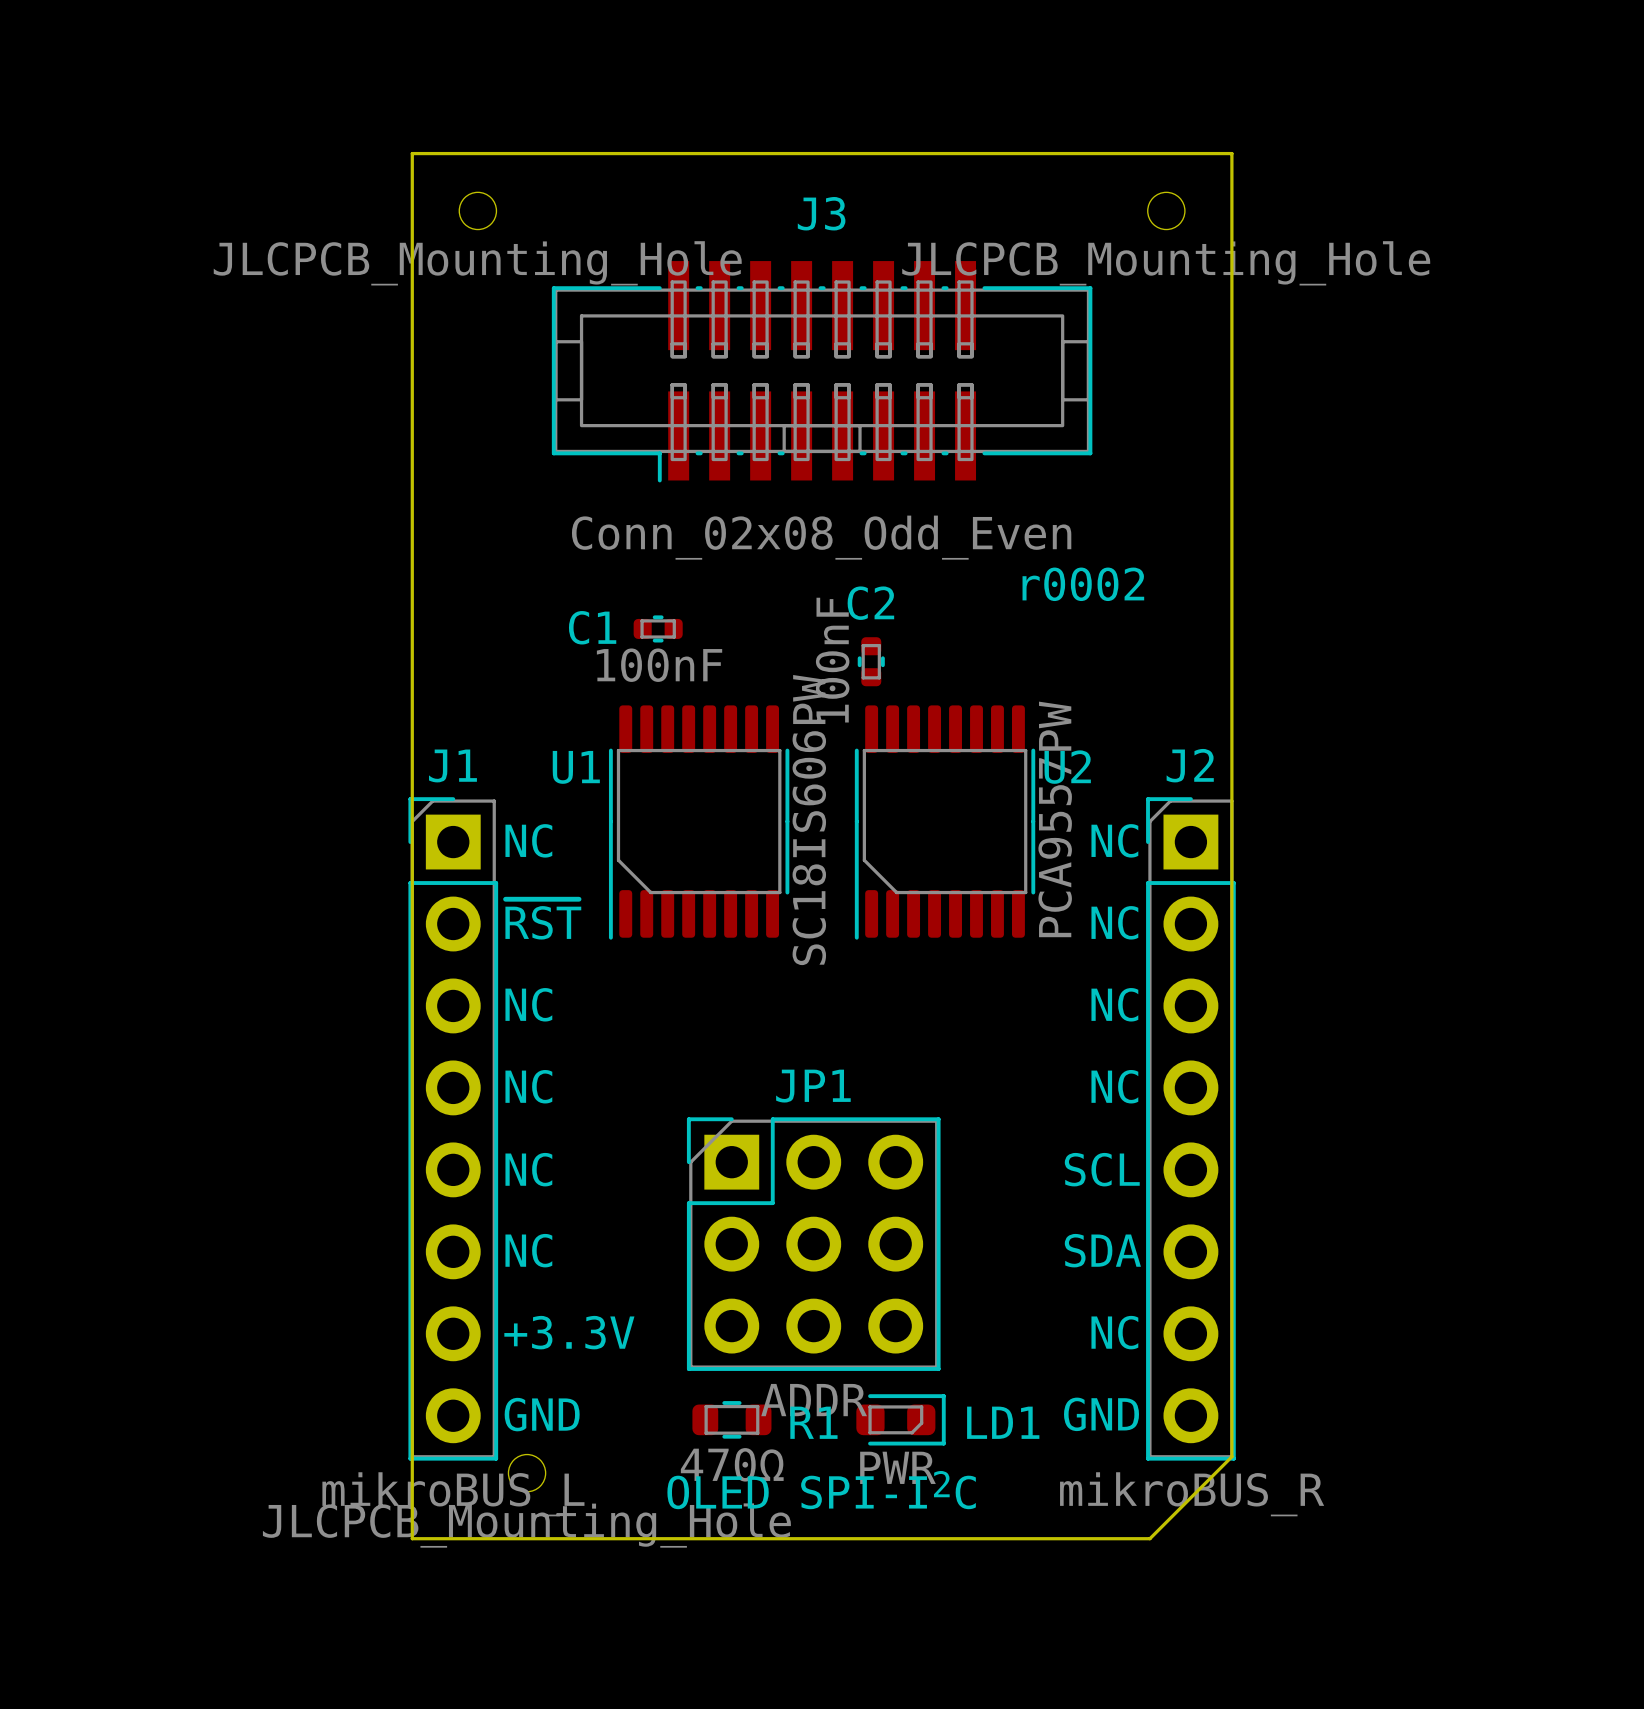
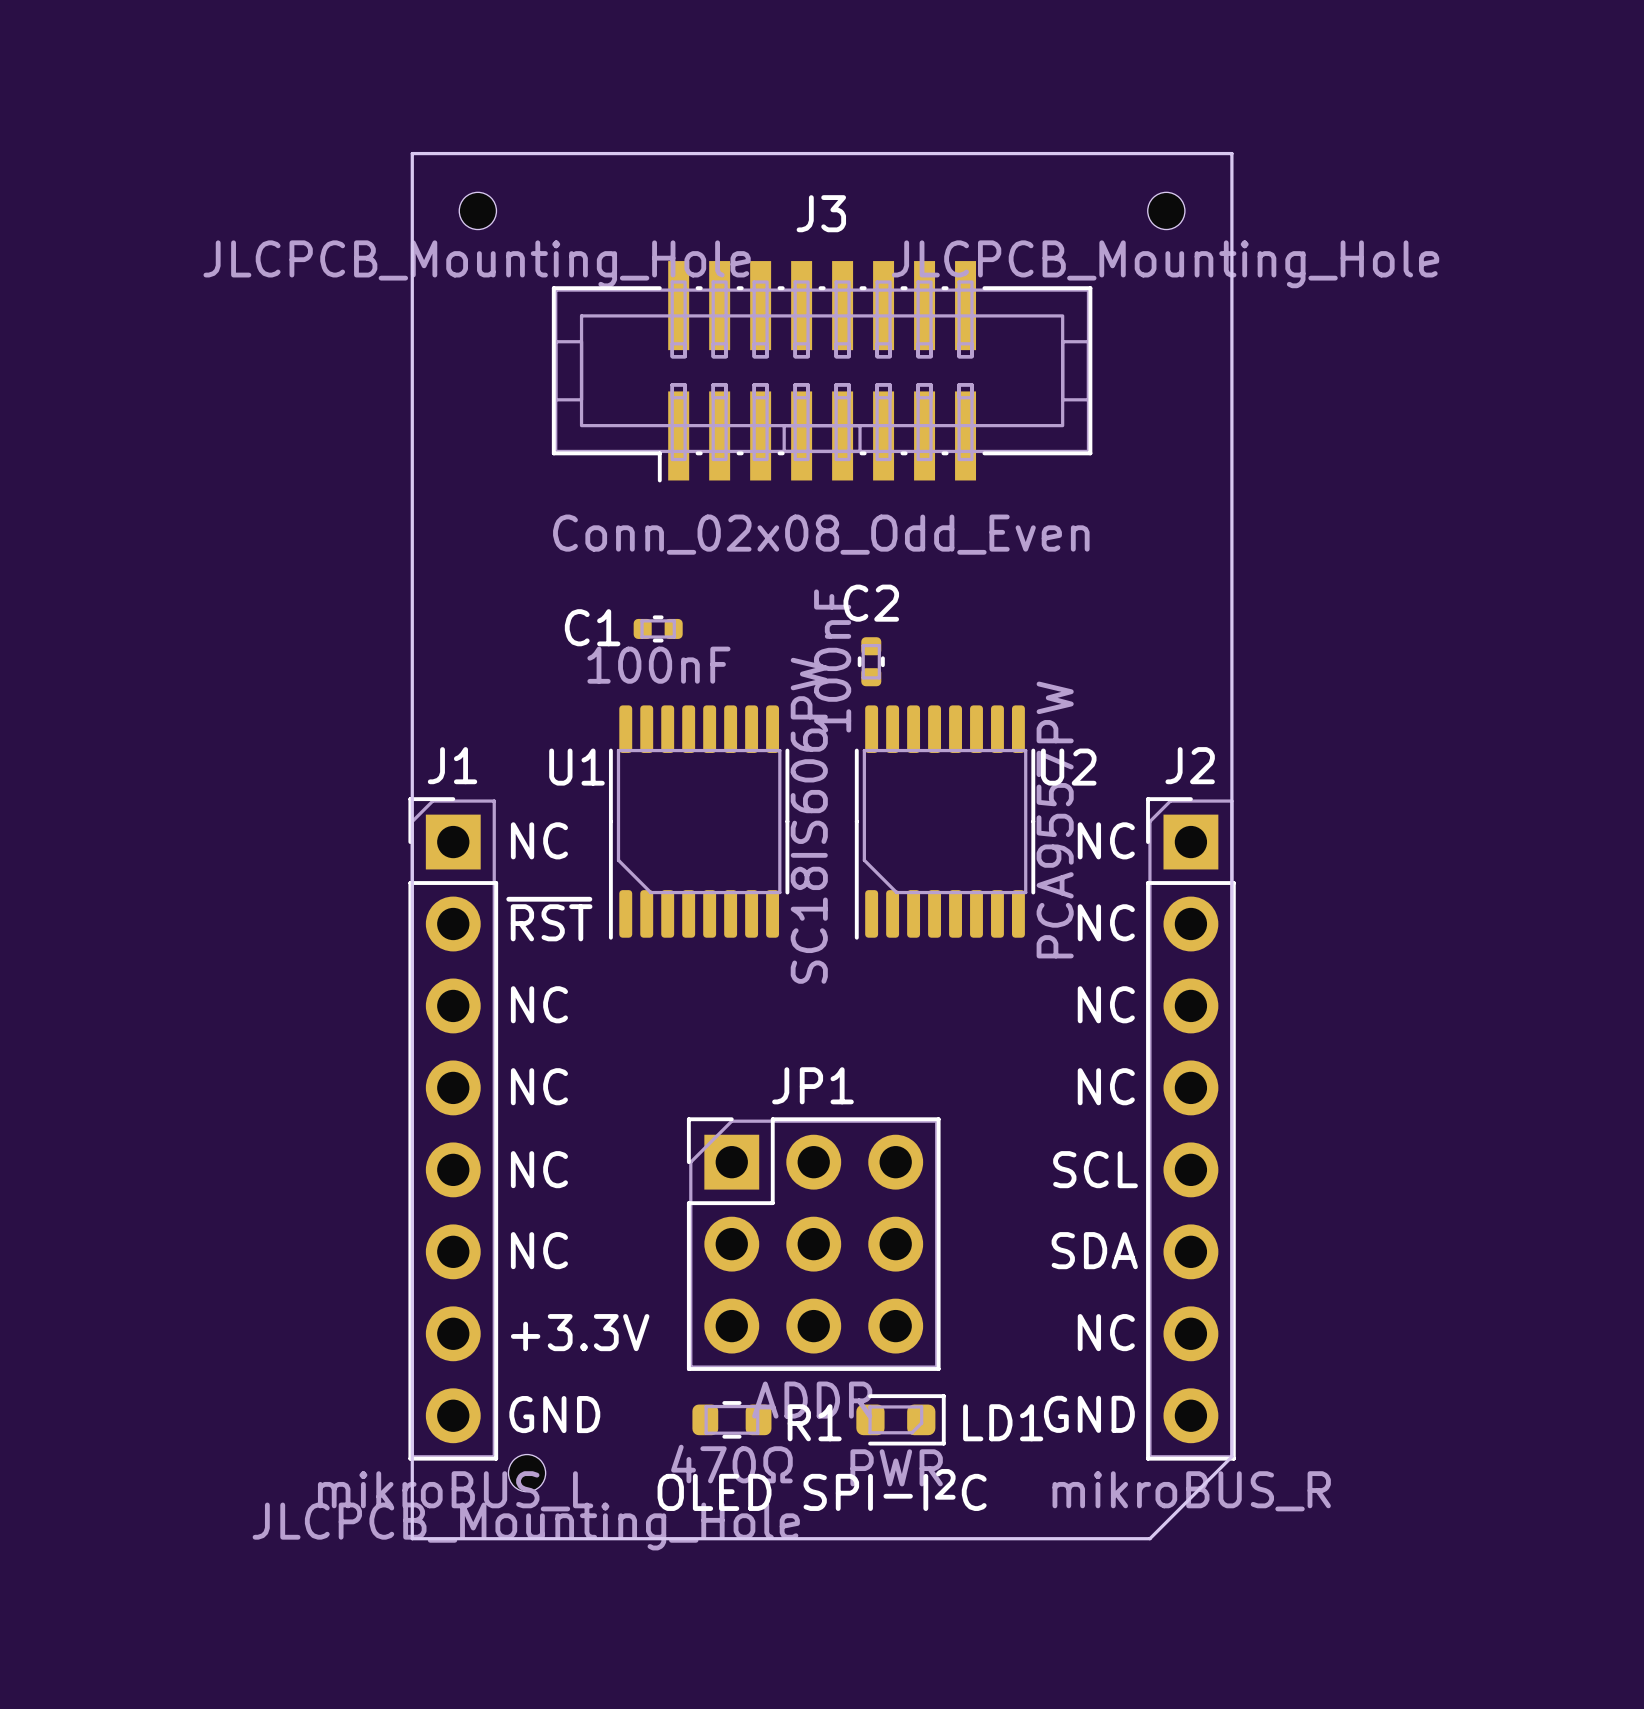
text: r0002 (1083, 584) -> none

